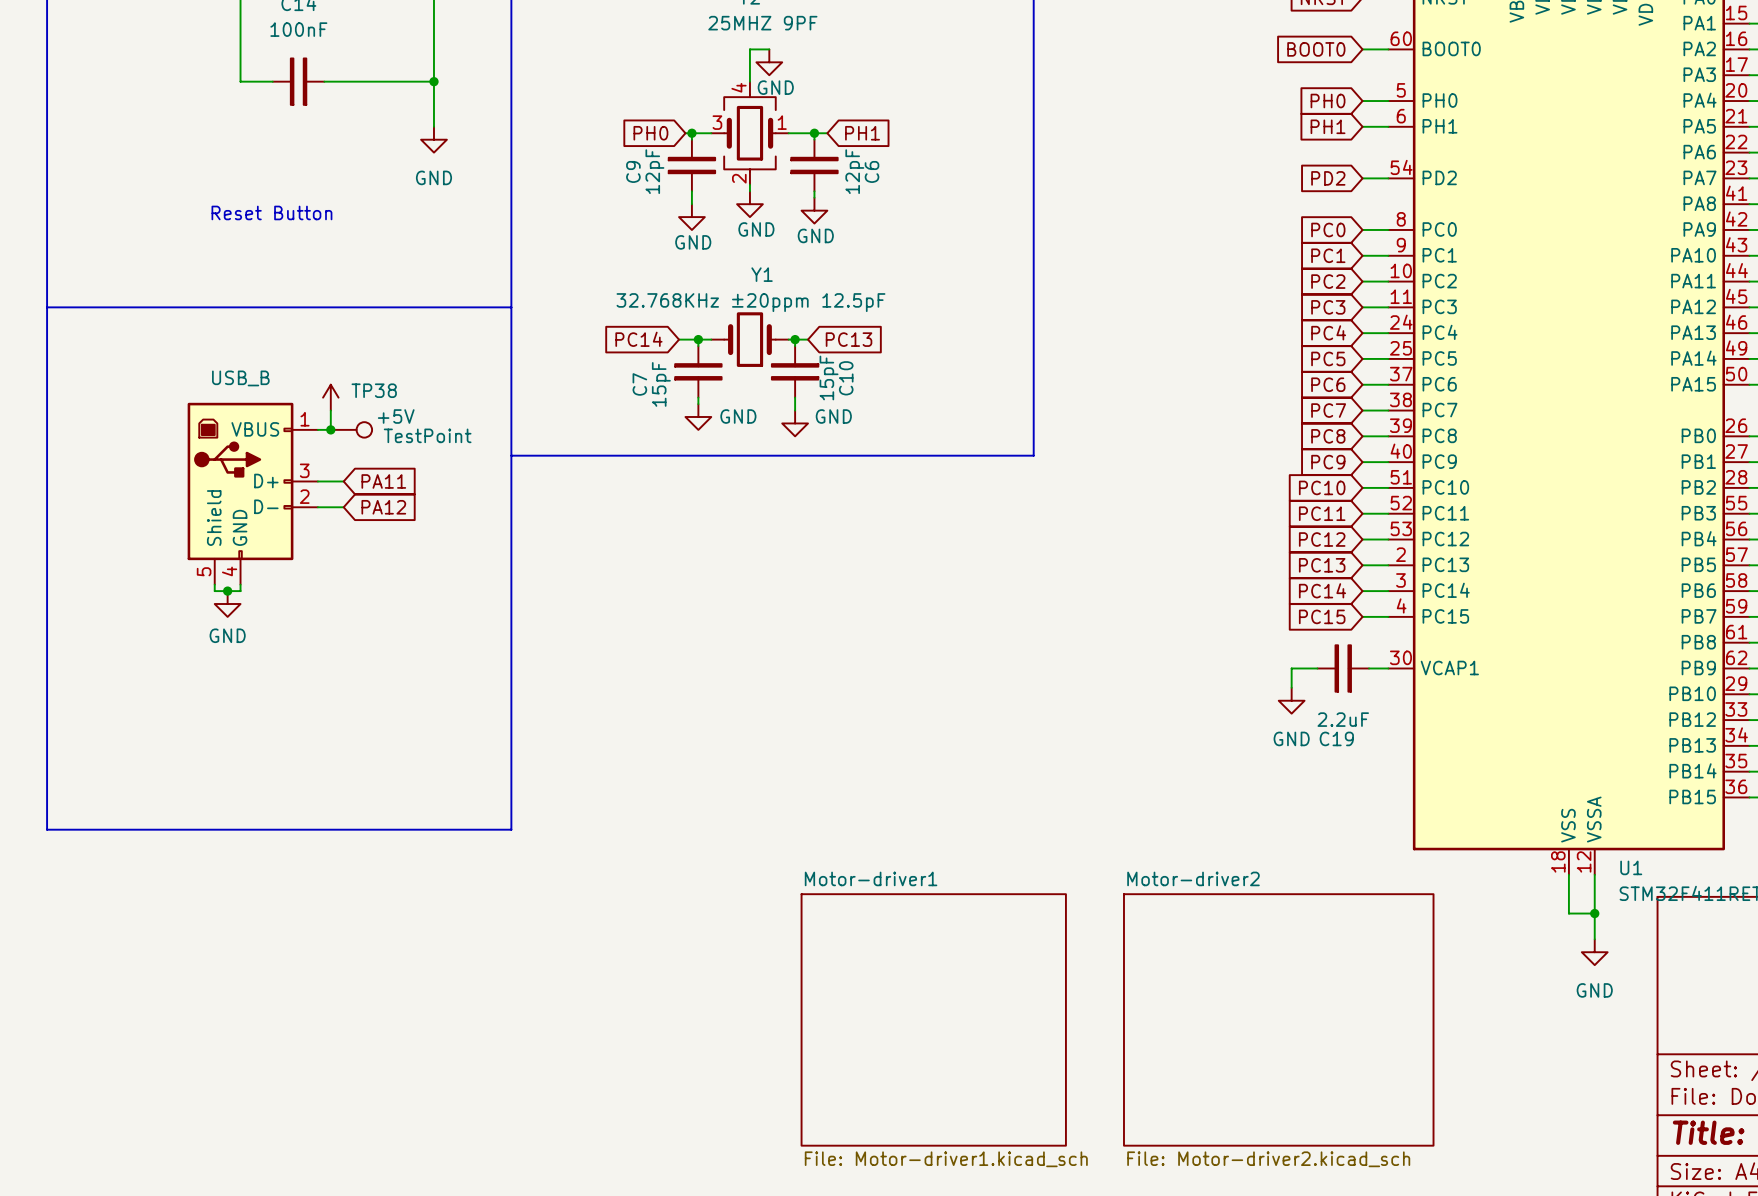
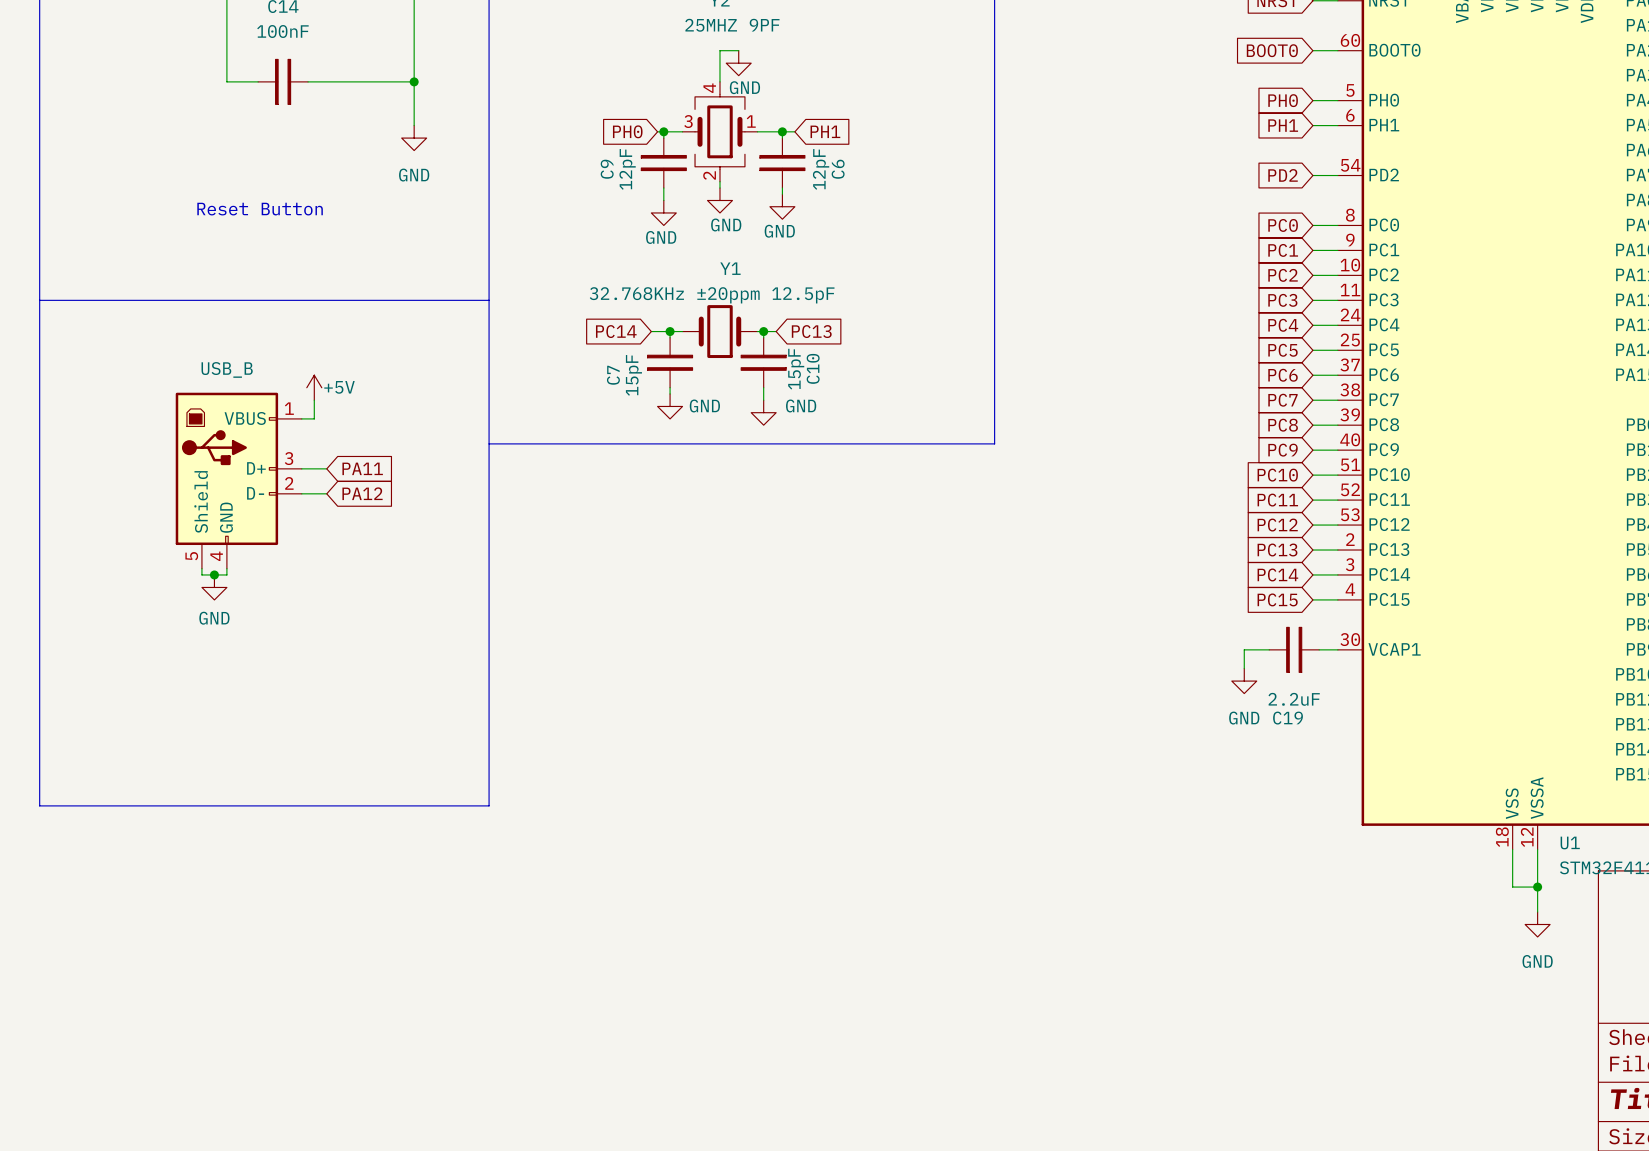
power symbol text position: +5V (396, 416) -> +5V (339, 387)
junction: (330, 429) -> none
TP38: TestPoint (351, 429) -> none
sheet Motor-driver1: File: Motor-driver1.kicad_sch (933, 1019) -> none
sheet Motor-driver2: File: Motor-driver2.kicad_sch (1278, 1019) -> none

